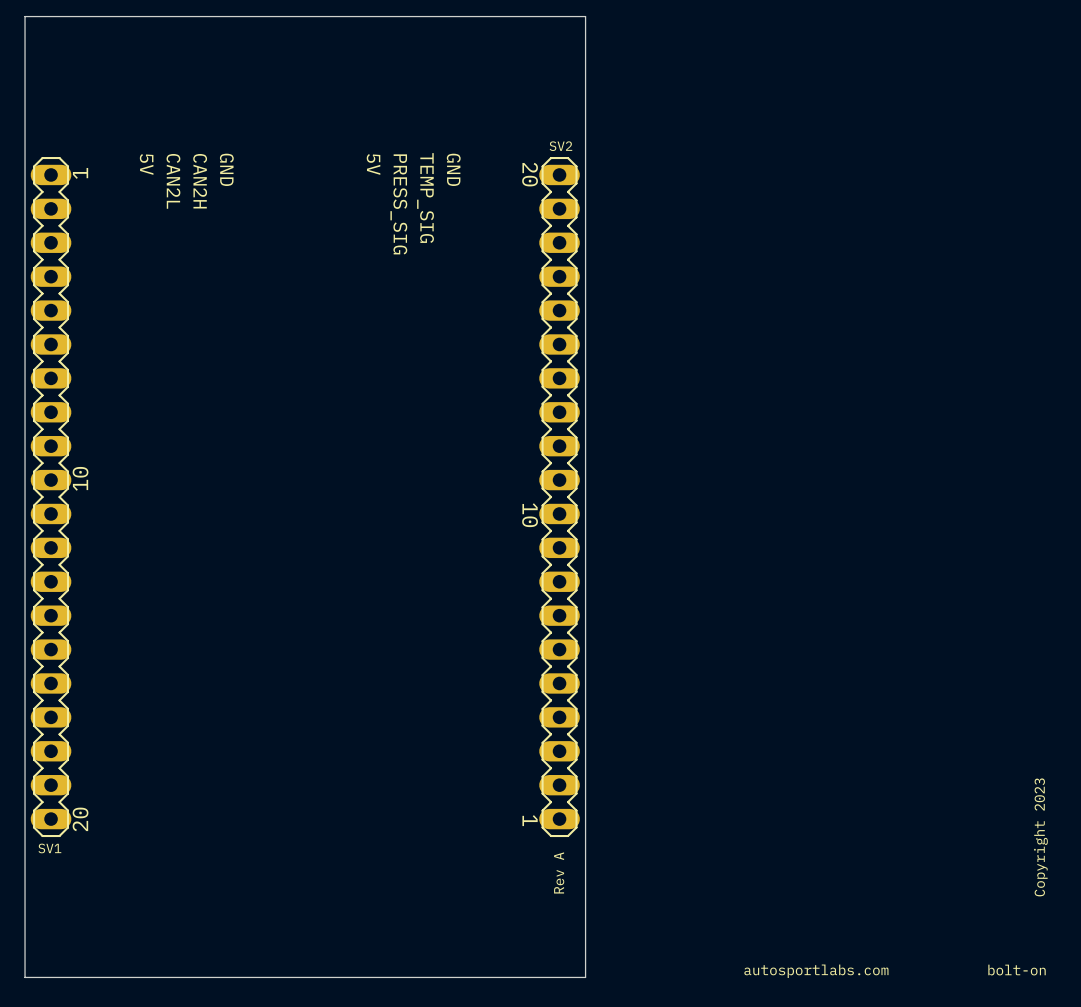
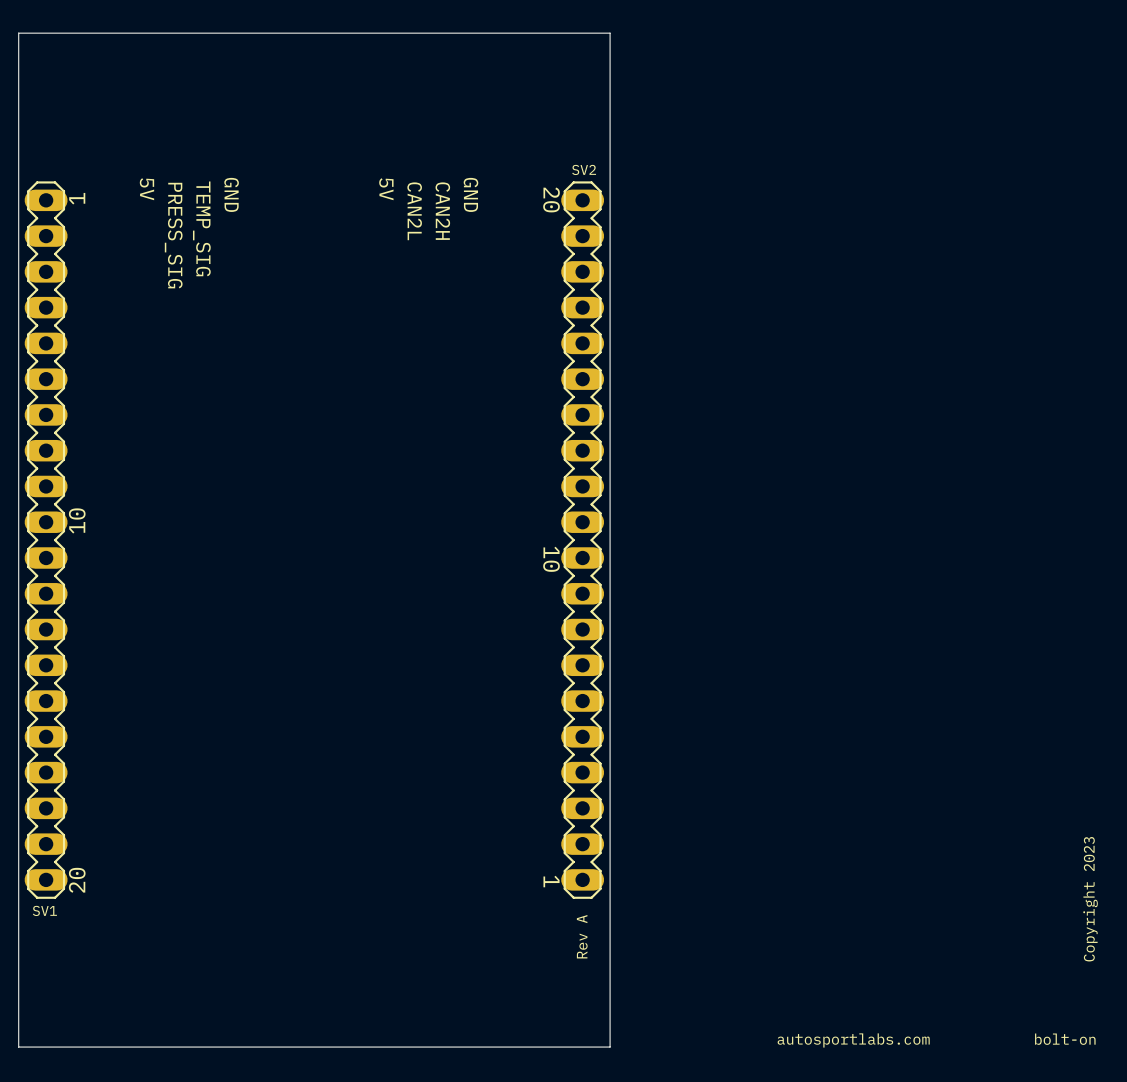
text: CAN2L (173, 181) -> PRESS_SIG (173, 235)
text: CAN2H (200, 181) -> TEMP_SIG (201, 228)
text: TEMP_SIG (425, 198) -> CAN2H (442, 211)
text: PRESS_SIG (398, 204) -> CAN2L (414, 211)

